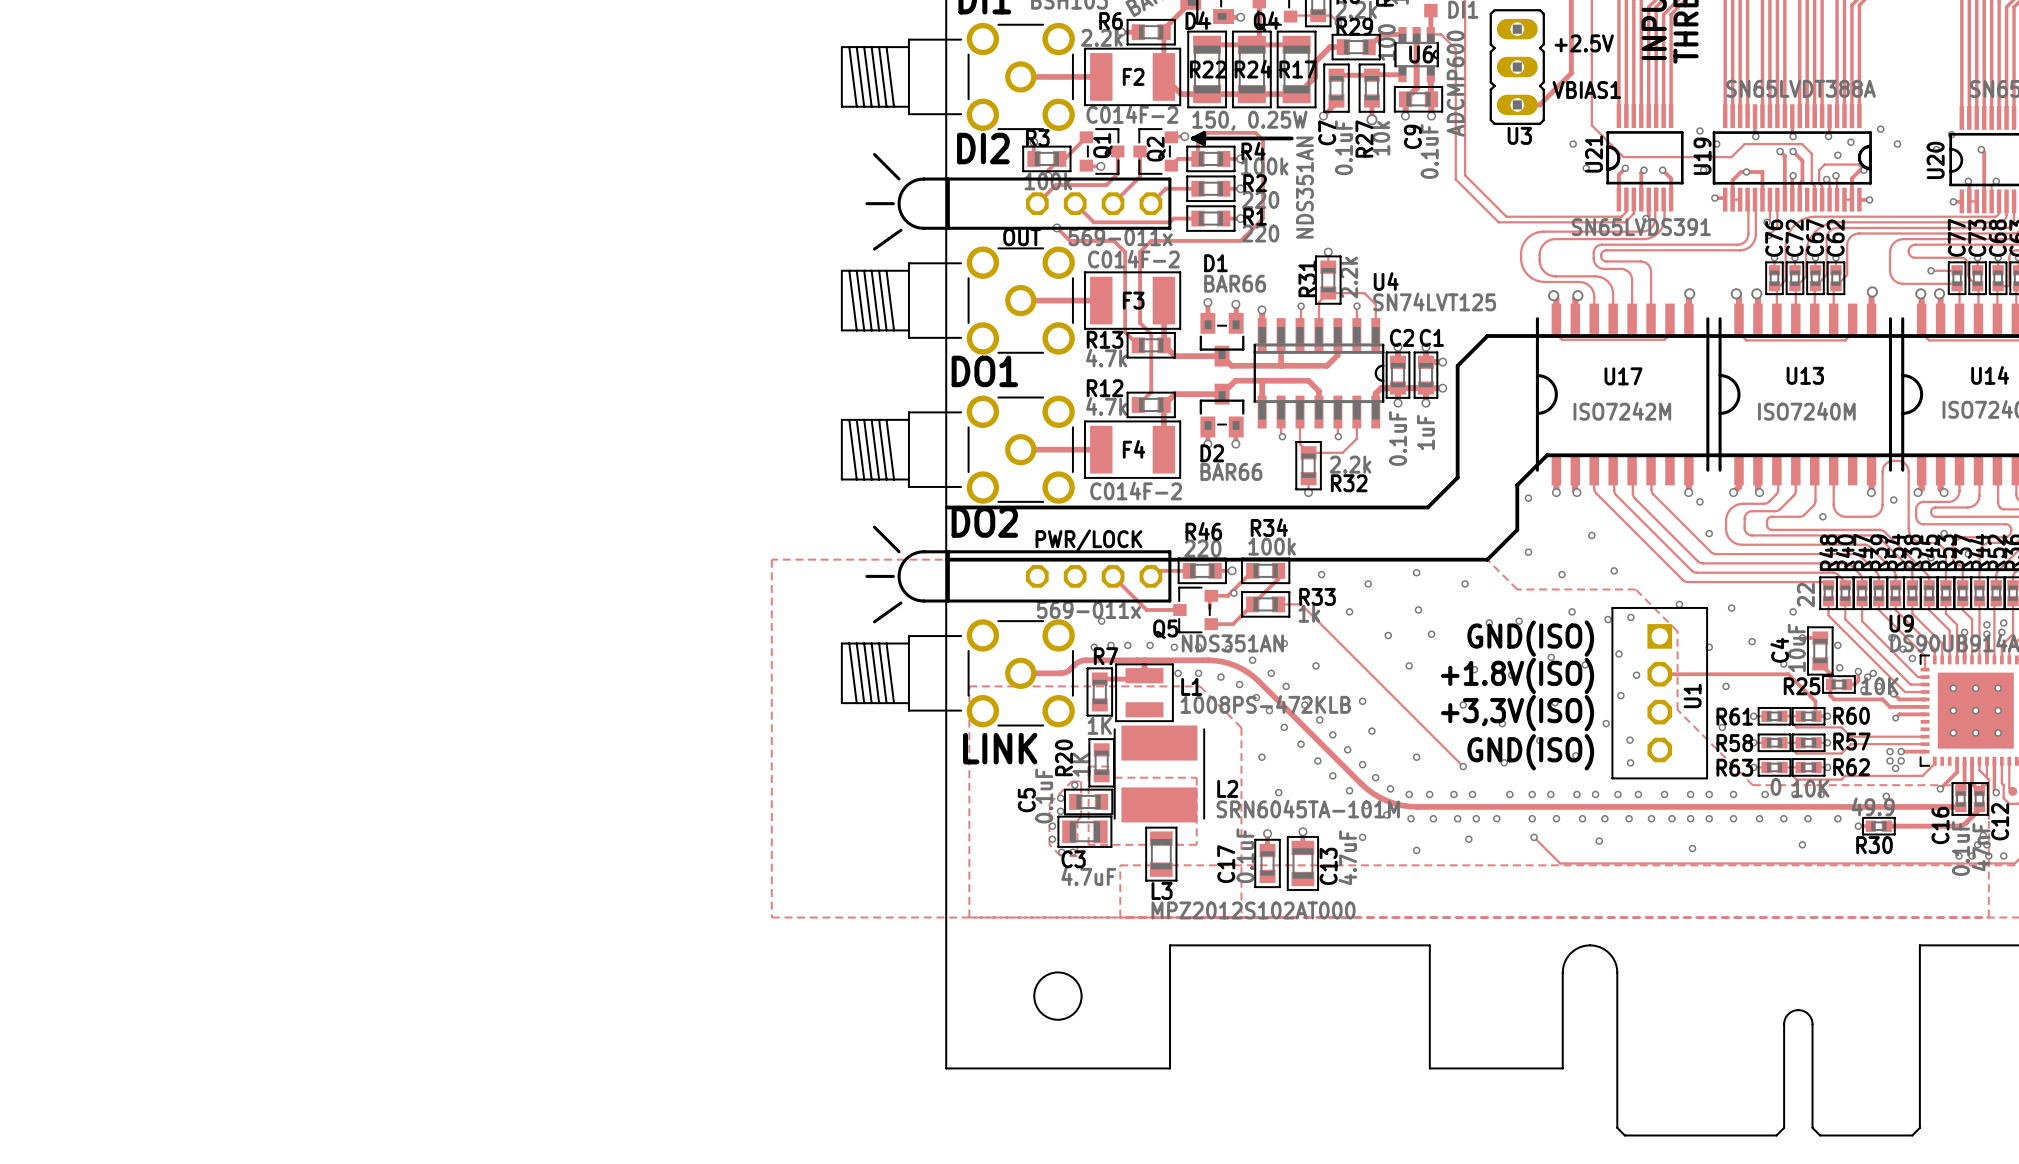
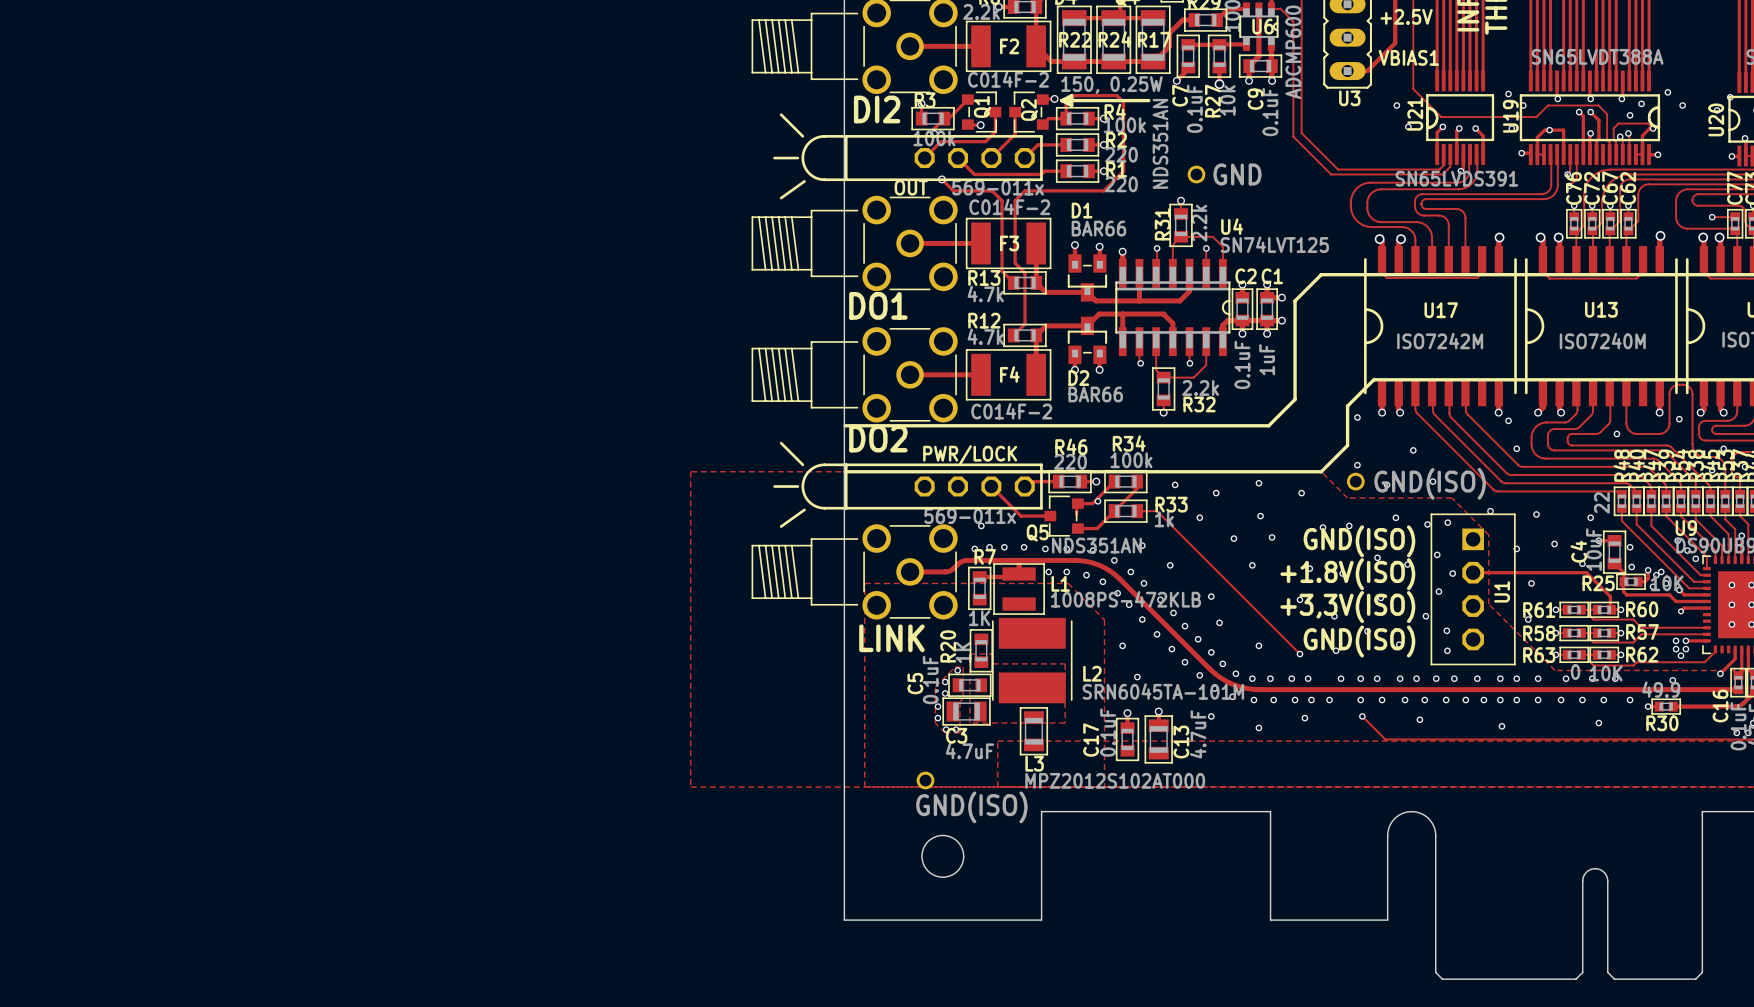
part: none -> GND (1196, 174)
part: none -> GND(ISO) (1355, 481)
part: none -> GND(ISO) (925, 780)

